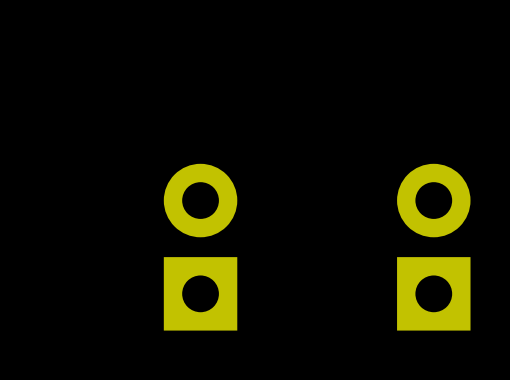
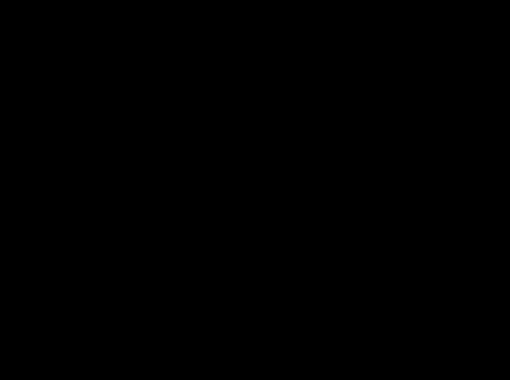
part: (200, 247) -> none
part: (433, 247) -> none

